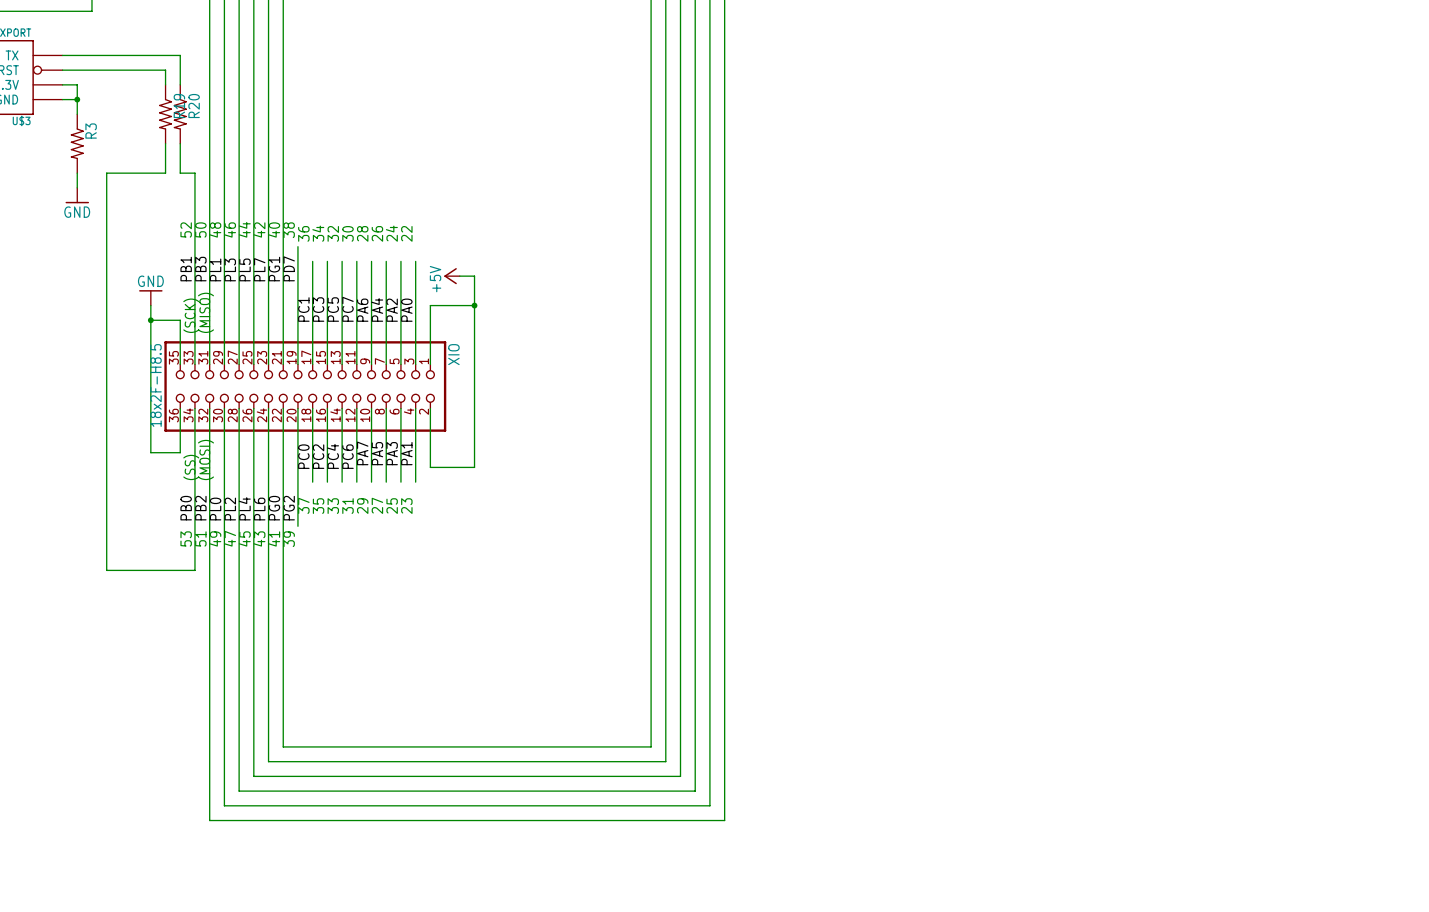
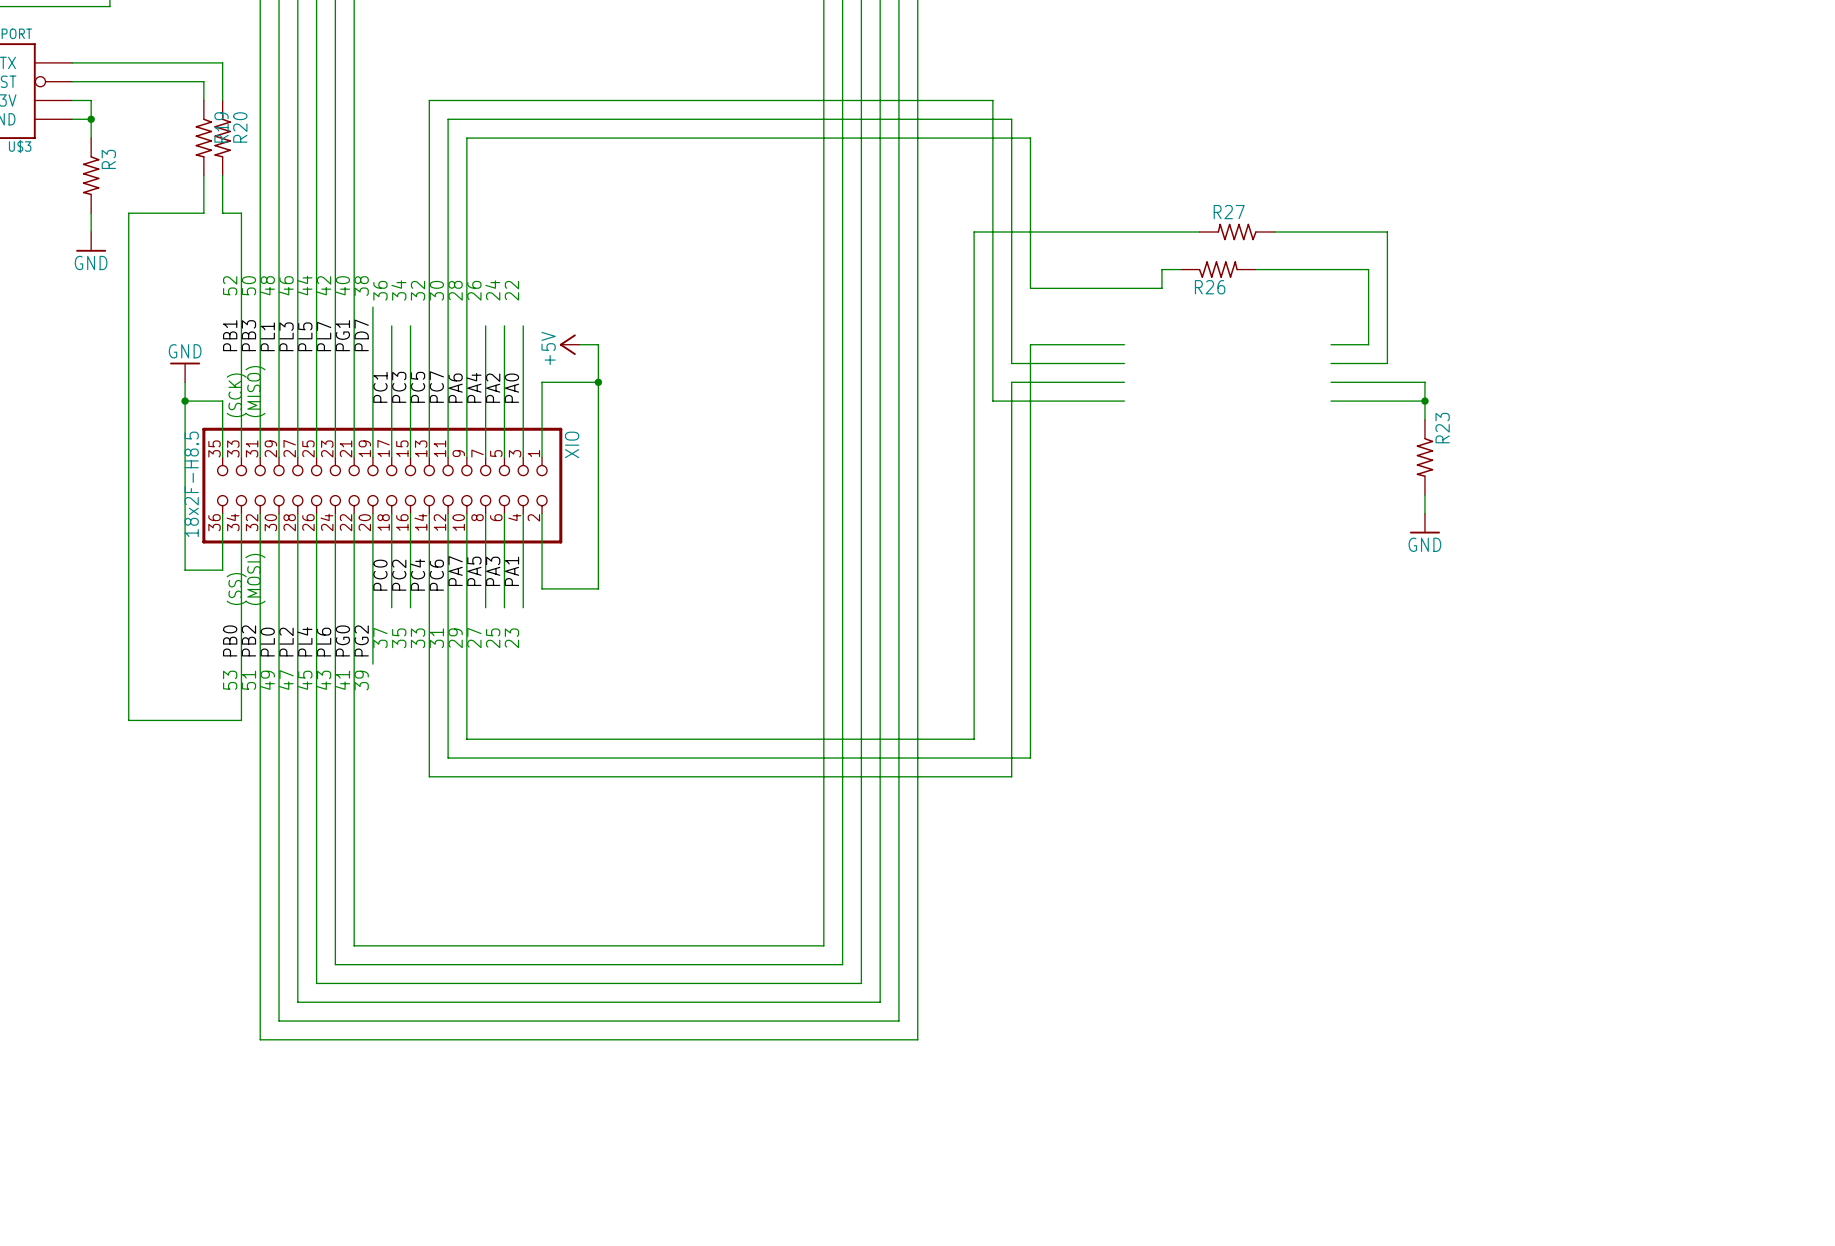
wire: none -> (1199, 232) (974, 232) (974, 739) (466, 739) (466, 607)
R27: none -> (1237, 232)
wire: none -> (1274, 232) (1387, 232) (1387, 363) (1331, 363)
wire: none -> (1180, 269) (1161, 269) (1161, 288) (1030, 288) (1030, 138) (466, 138) (466, 325)
R26: none -> (1218, 269)
wire: none -> (1255, 269) (1368, 269) (1368, 344) (1331, 344)
wire: none -> (429, 325) (429, 100) (992, 100) (992, 401) (1124, 401)
wire: none -> (448, 325) (448, 119) (1011, 119) (1011, 363) (1124, 363)
wire: none -> (1124, 344) (1030, 344) (1030, 758) (448, 758) (448, 607)
wire: none -> (1124, 382) (1011, 382) (1011, 776) (429, 776) (429, 607)
wire: none -> (1331, 382) (1424, 382) (1424, 419)
wire: none -> (1331, 401) (1424, 401)
junction: none -> (1424, 401)
R23: none -> (1424, 457)
wire: none -> (1424, 495) (1424, 513)
power symbol: none -> GND (1424, 523)

